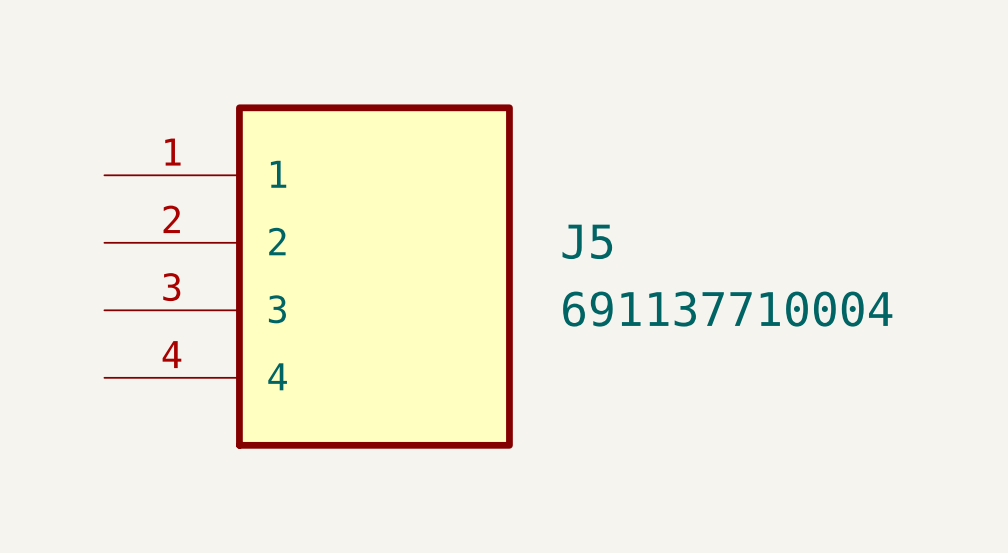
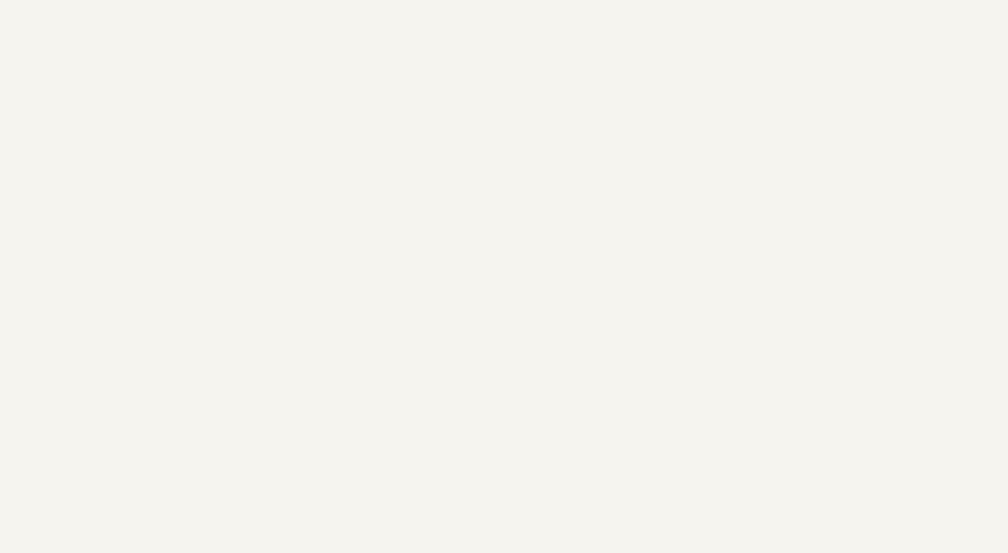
J5: 691137710004 (308, 276) -> none

